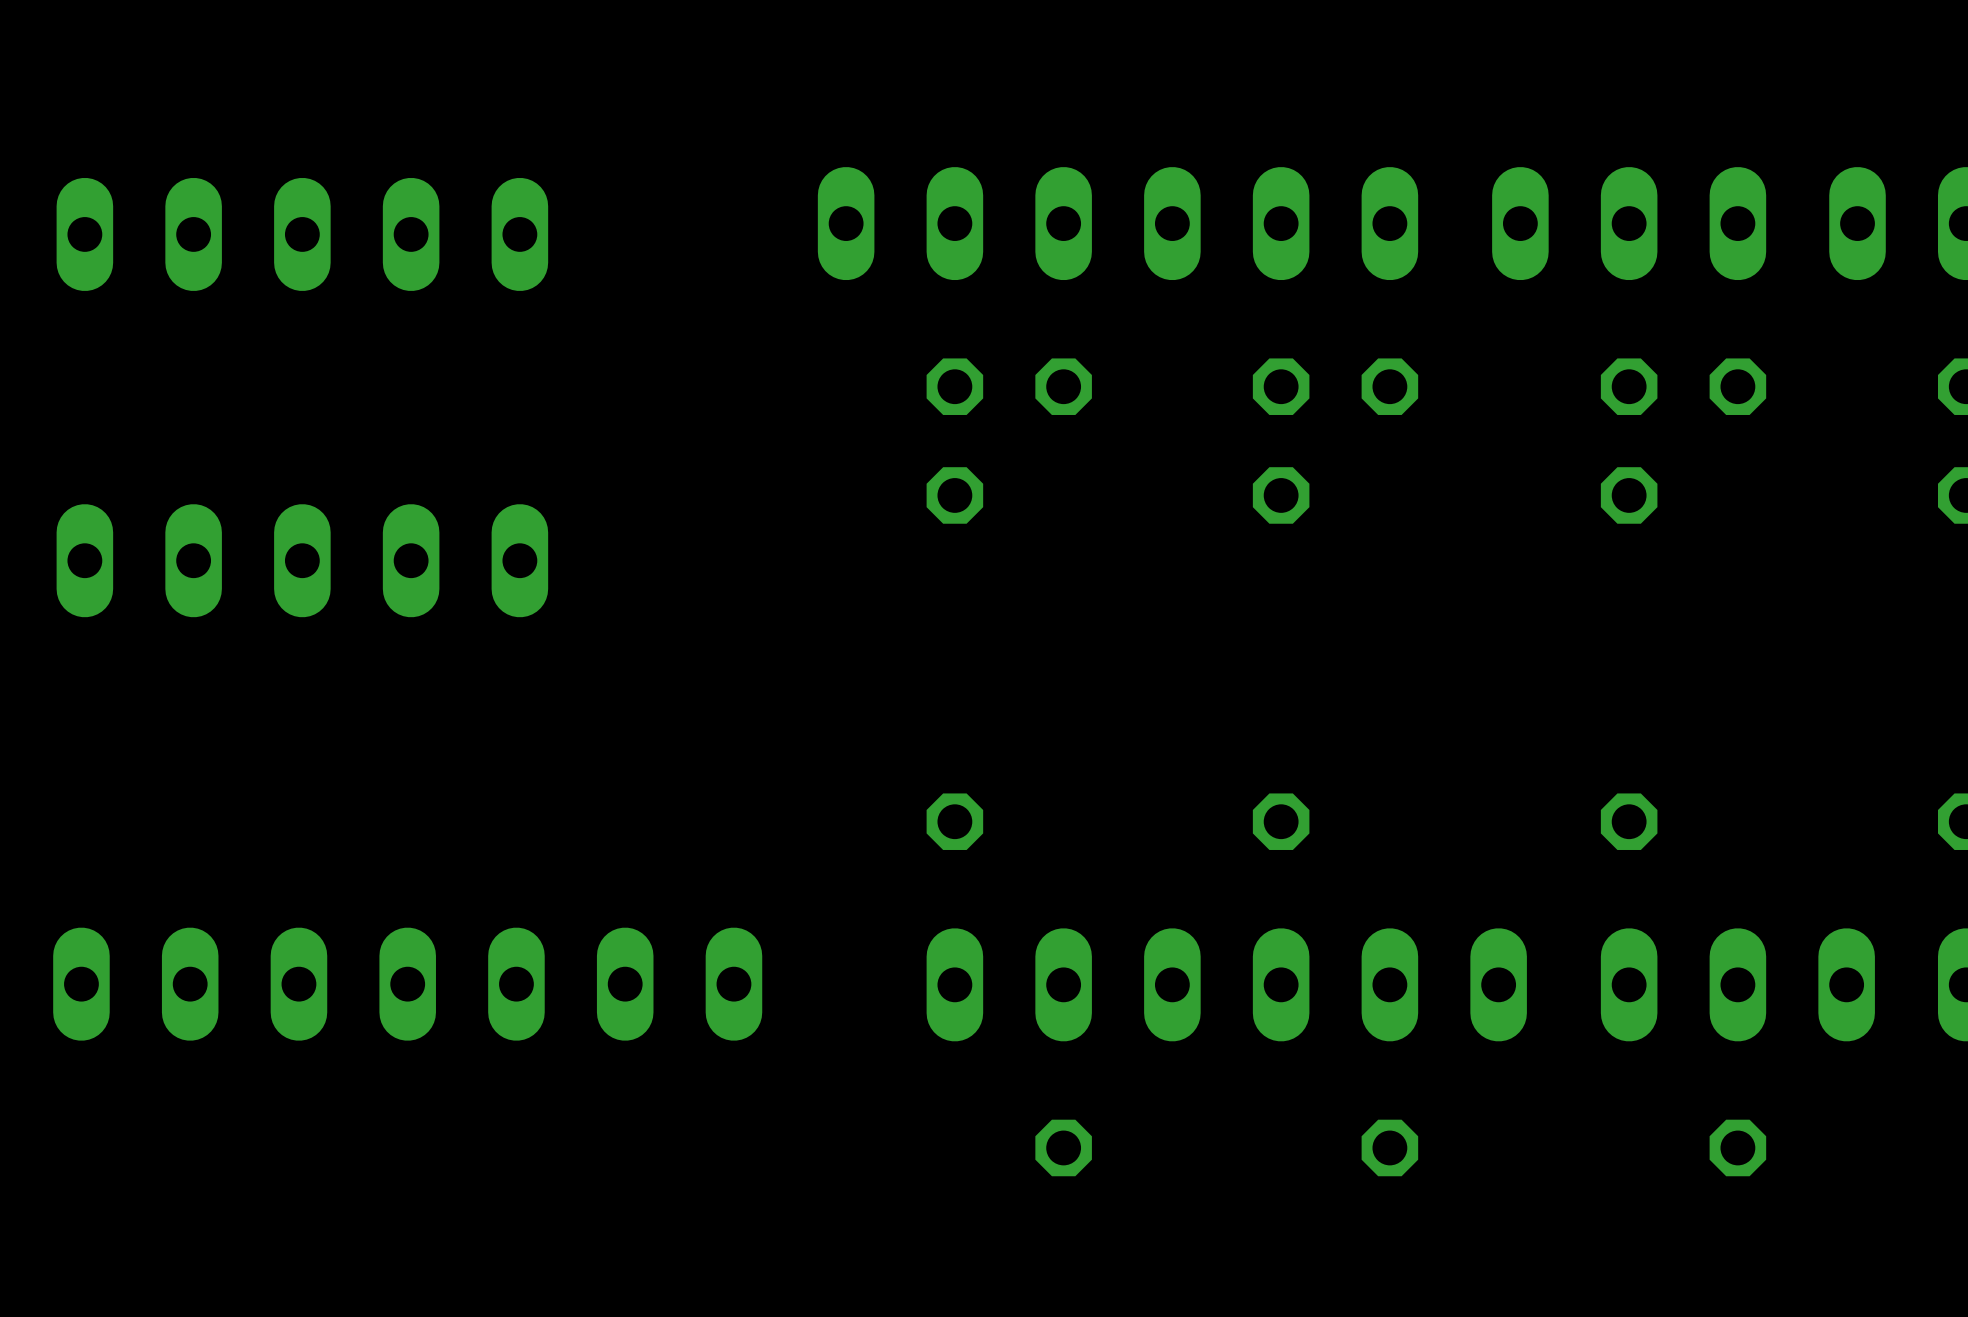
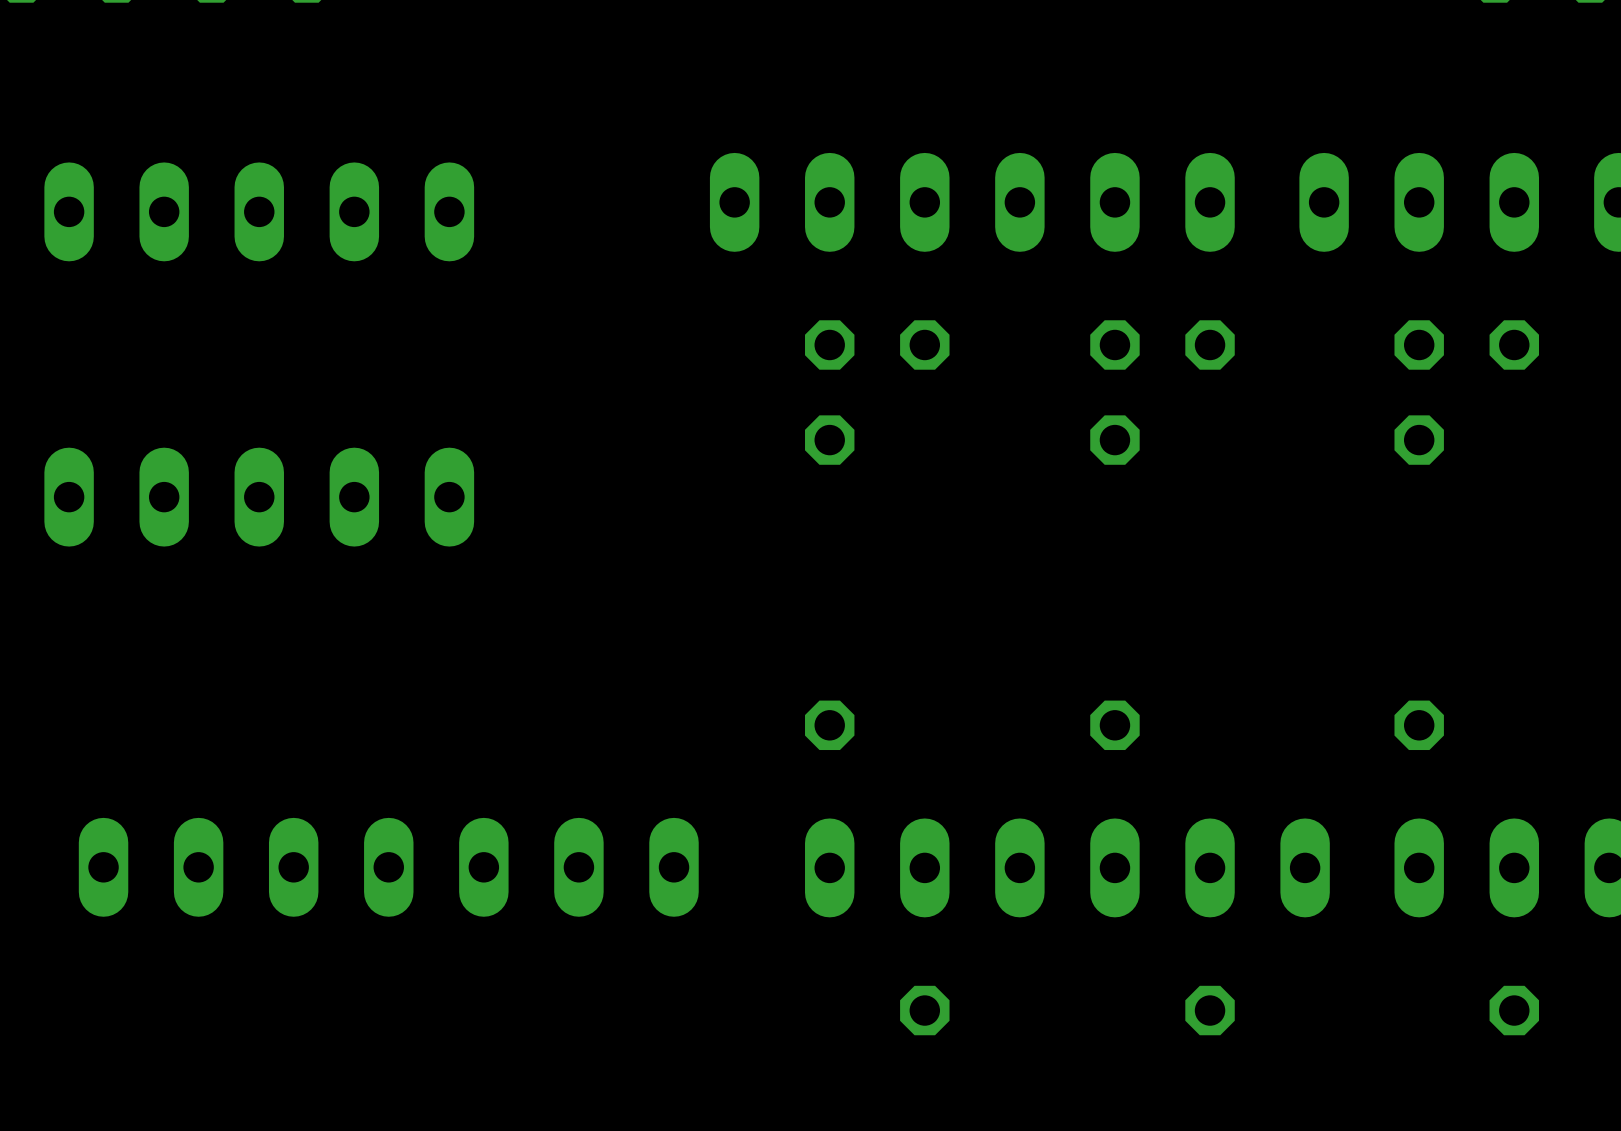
part position: (407, 984) -> (388, 867)

